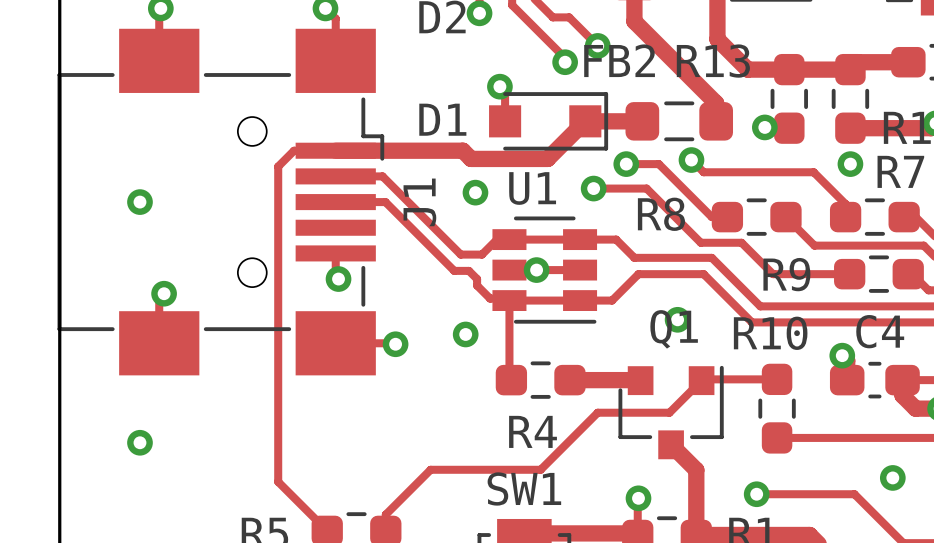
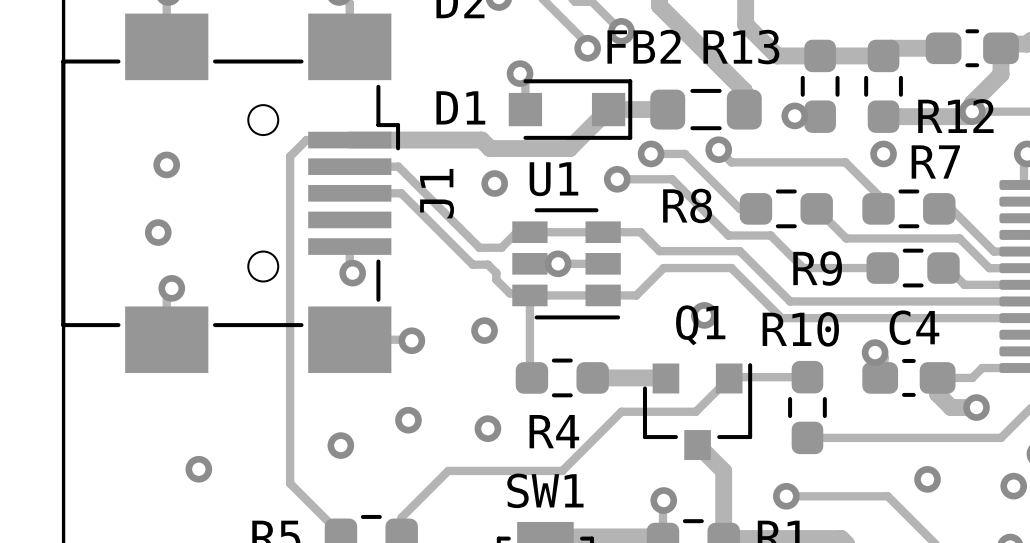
via: none -> (166, 164)
via: (139, 202) -> none
via: none -> (158, 232)
via: none -> (408, 420)
via: none -> (487, 428)
via position: (139, 442) -> (198, 469)
via: none -> (340, 445)

